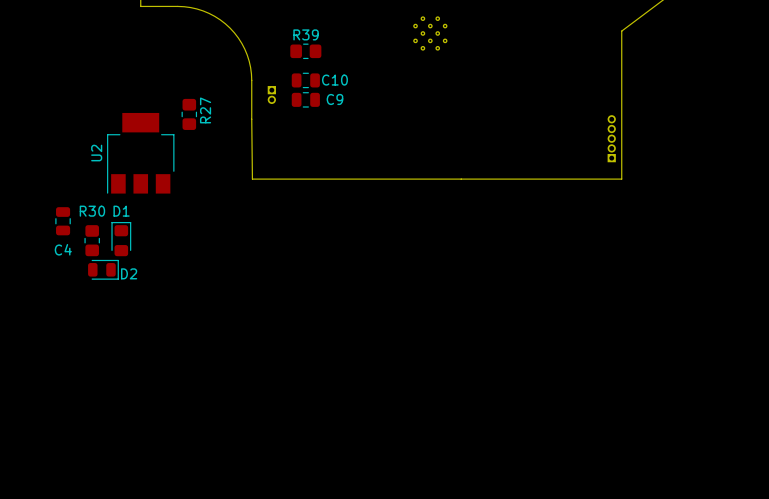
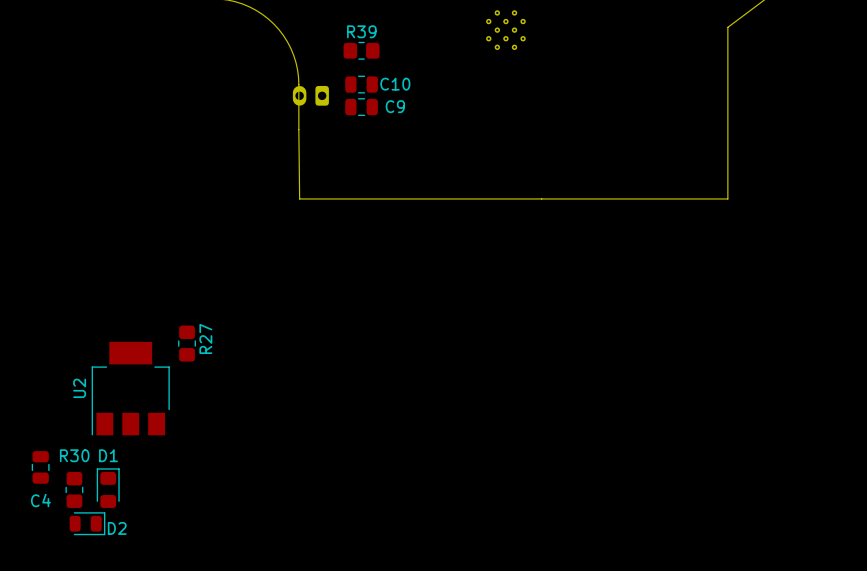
part: none -> (310, 95)
part: (271, 95) -> none
R27 position: (189, 114) -> (187, 343)
part: (611, 138) -> none
U2 position: (140, 153) -> (130, 388)
C4 position: (63, 221) -> (40, 467)
D1 position: (121, 239) -> (108, 488)
R30 position: (92, 240) -> (74, 489)
D2 position: (103, 269) -> (87, 523)

